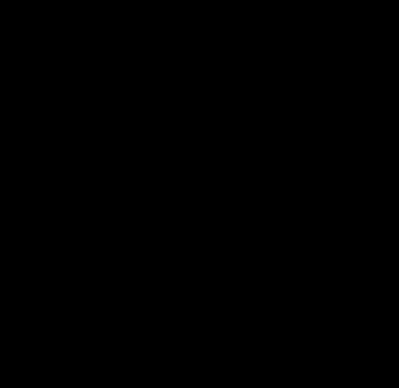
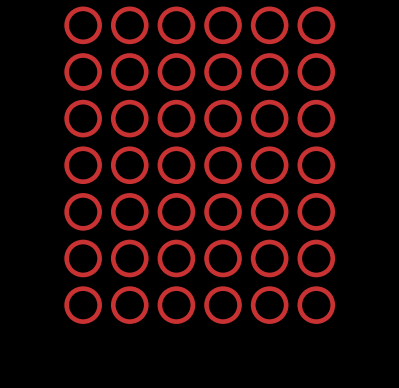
part: none -> (199, 25)
part: none -> (199, 71)
part: none -> (199, 118)
part: none -> (199, 165)
part: none -> (199, 211)
part: none -> (199, 258)
part: none -> (199, 305)

